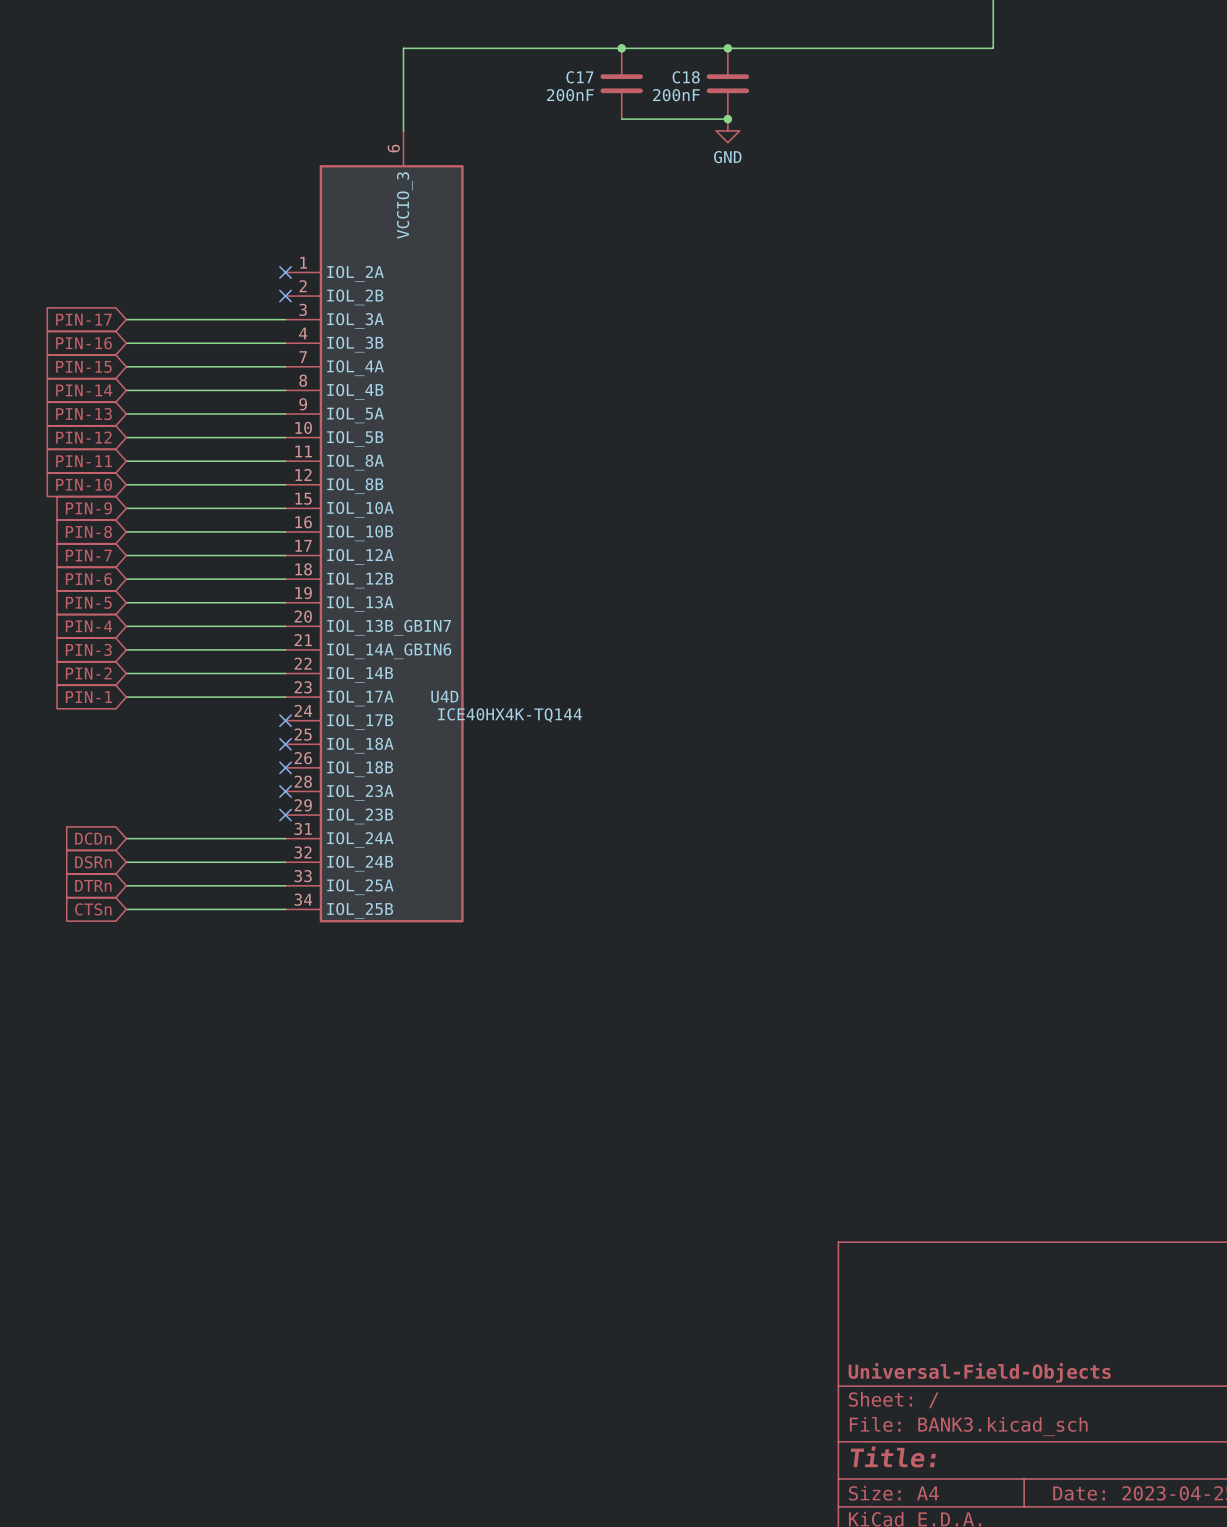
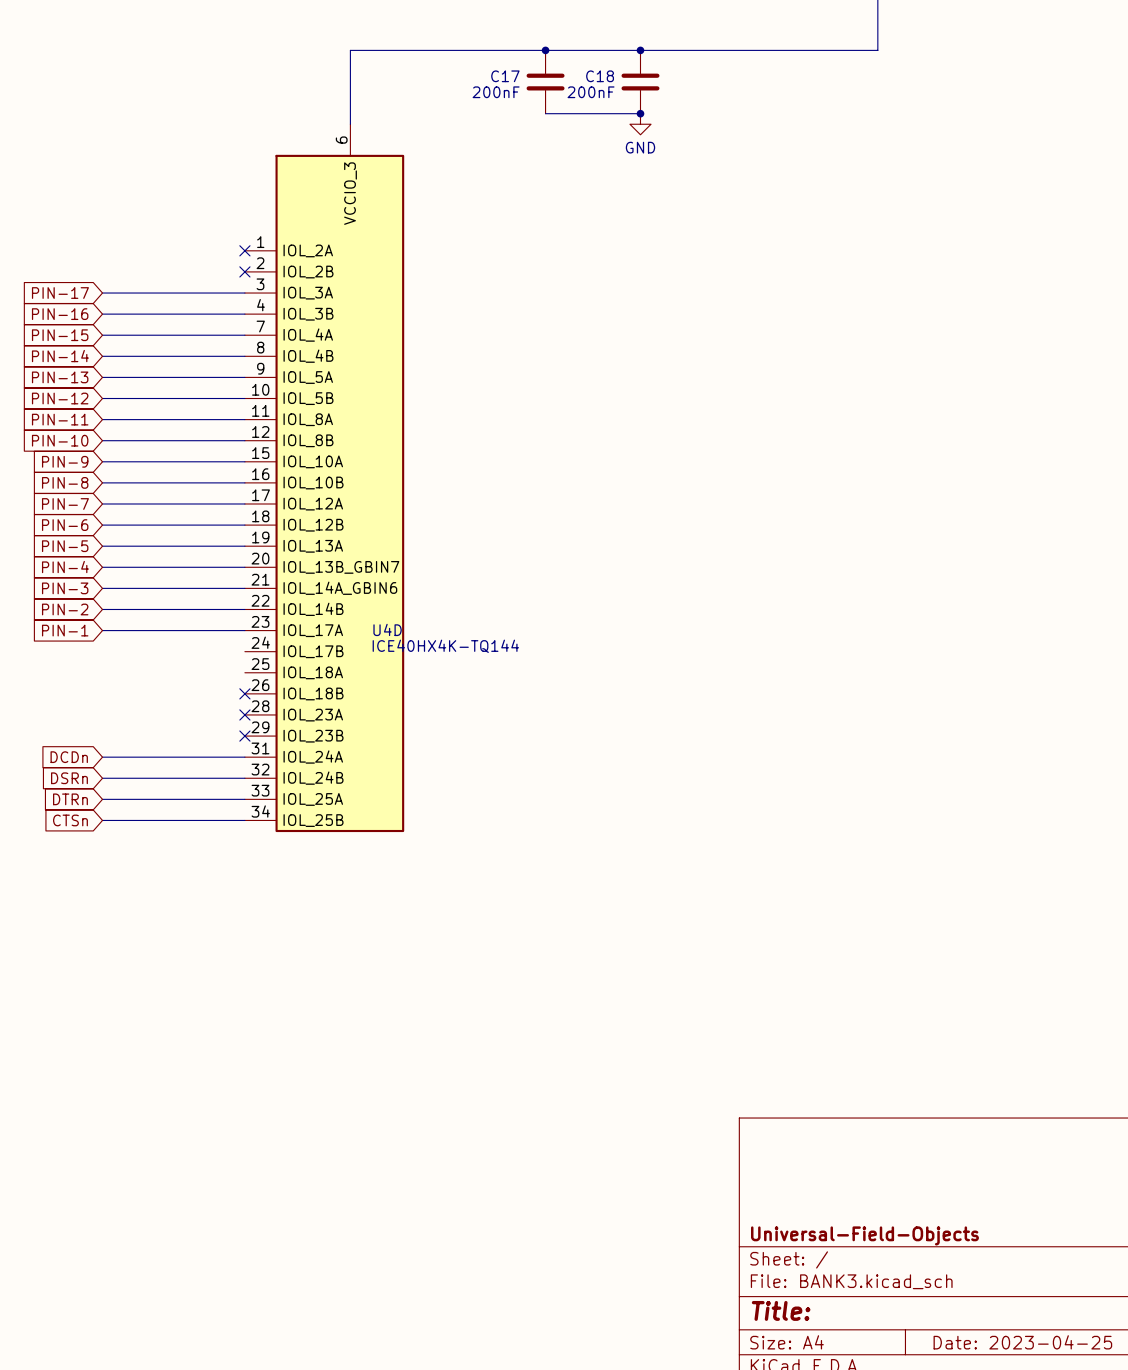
no-connect mark: (285, 720) -> none
no-connect mark: (285, 744) -> none

